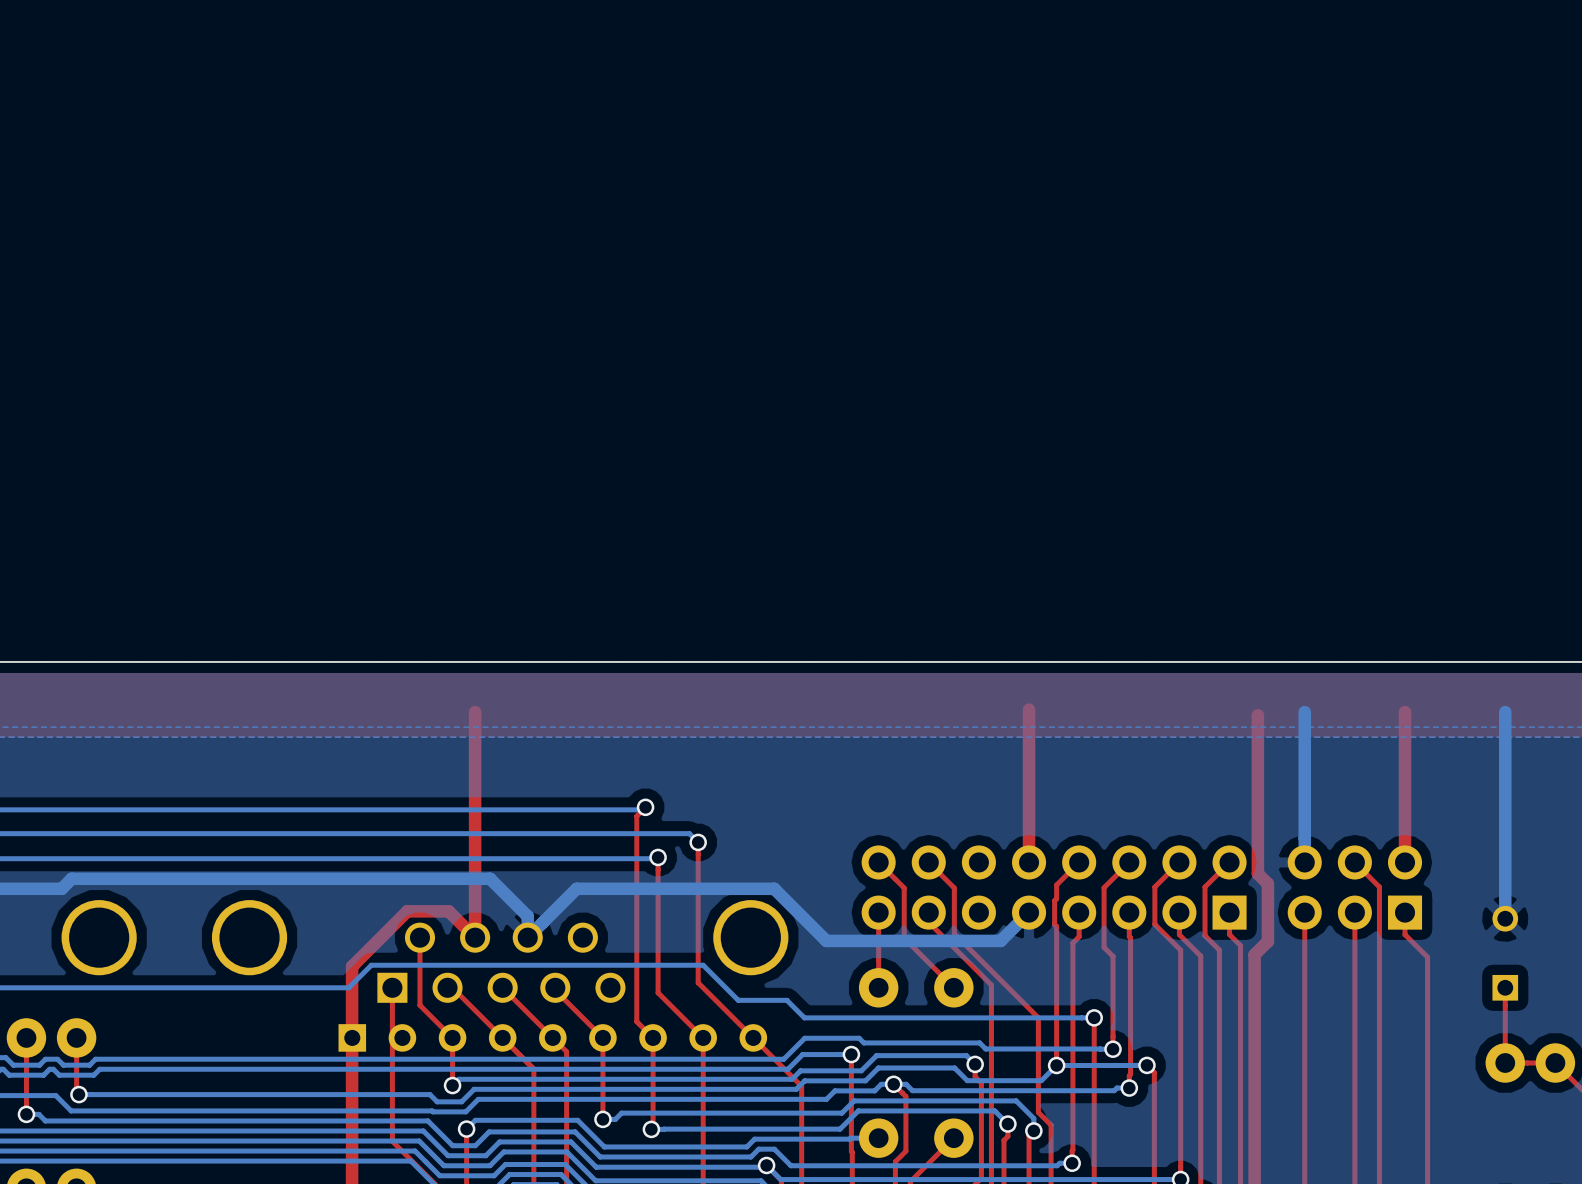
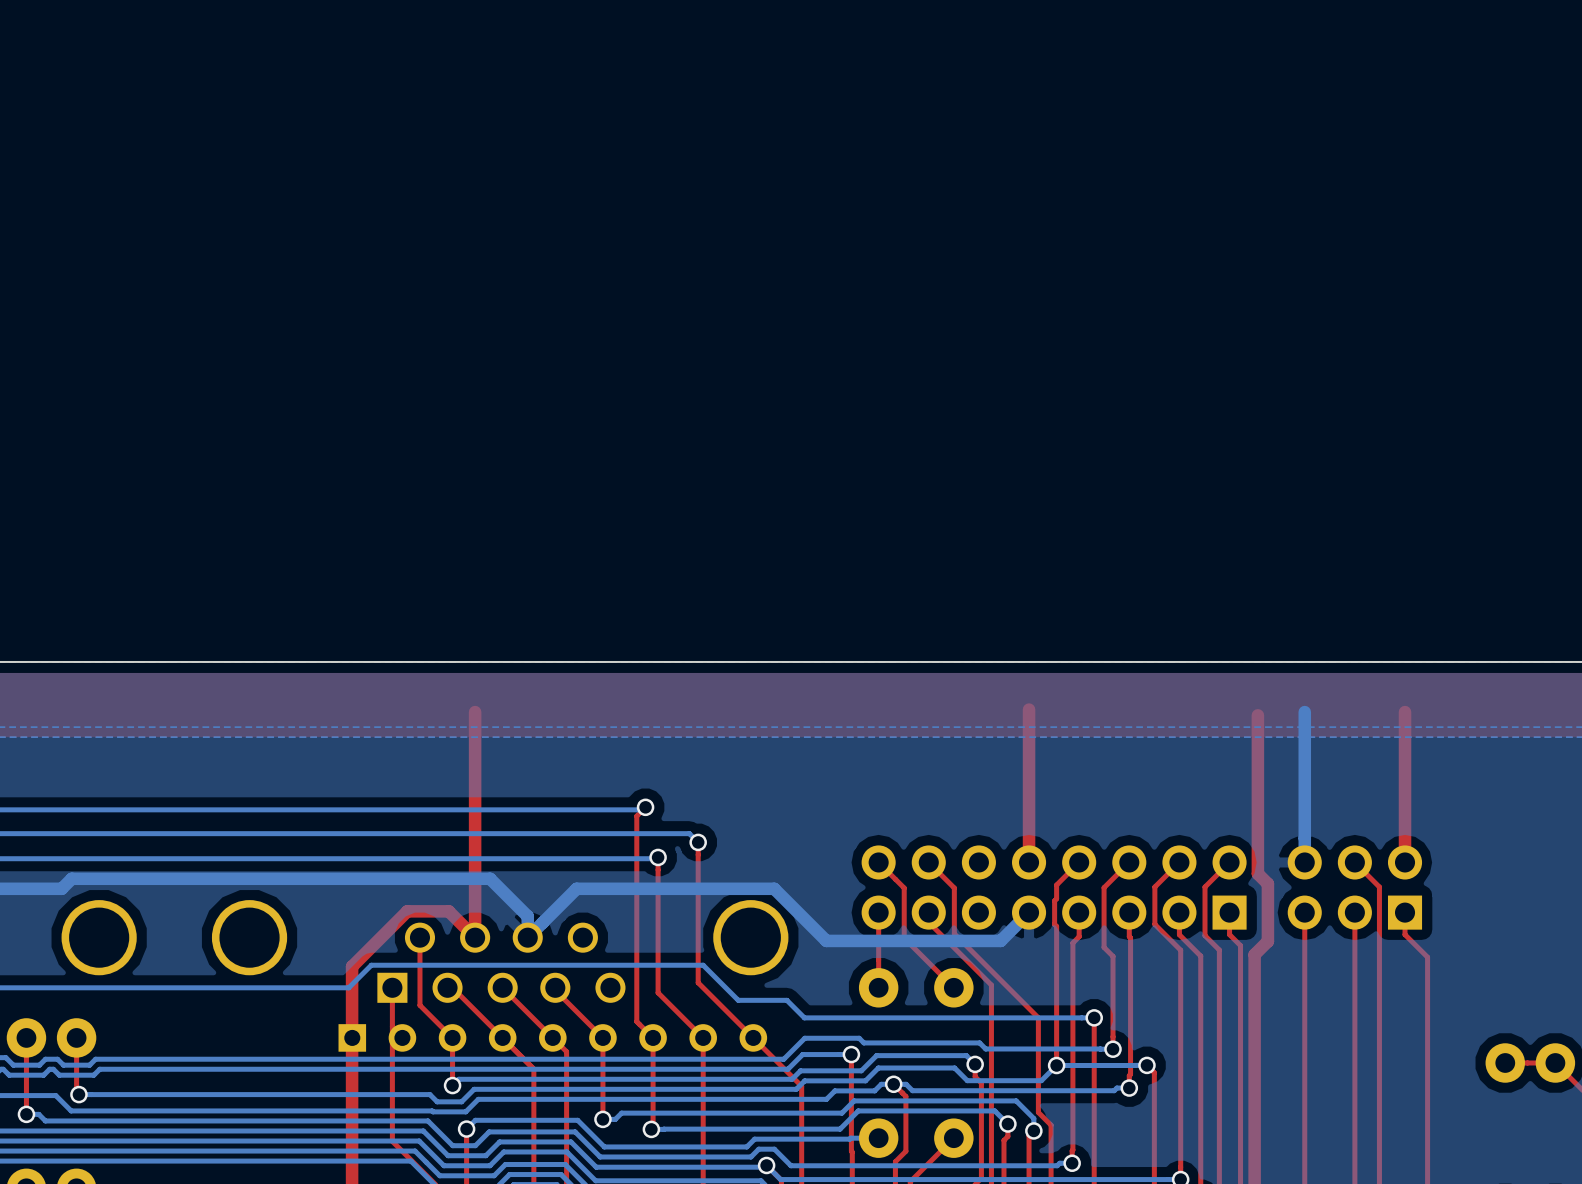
bottom track: (1505, 712) (1505, 918) -> none
part: (1505, 953) -> none
top track: (1505, 987) (1505, 1062) -> none

